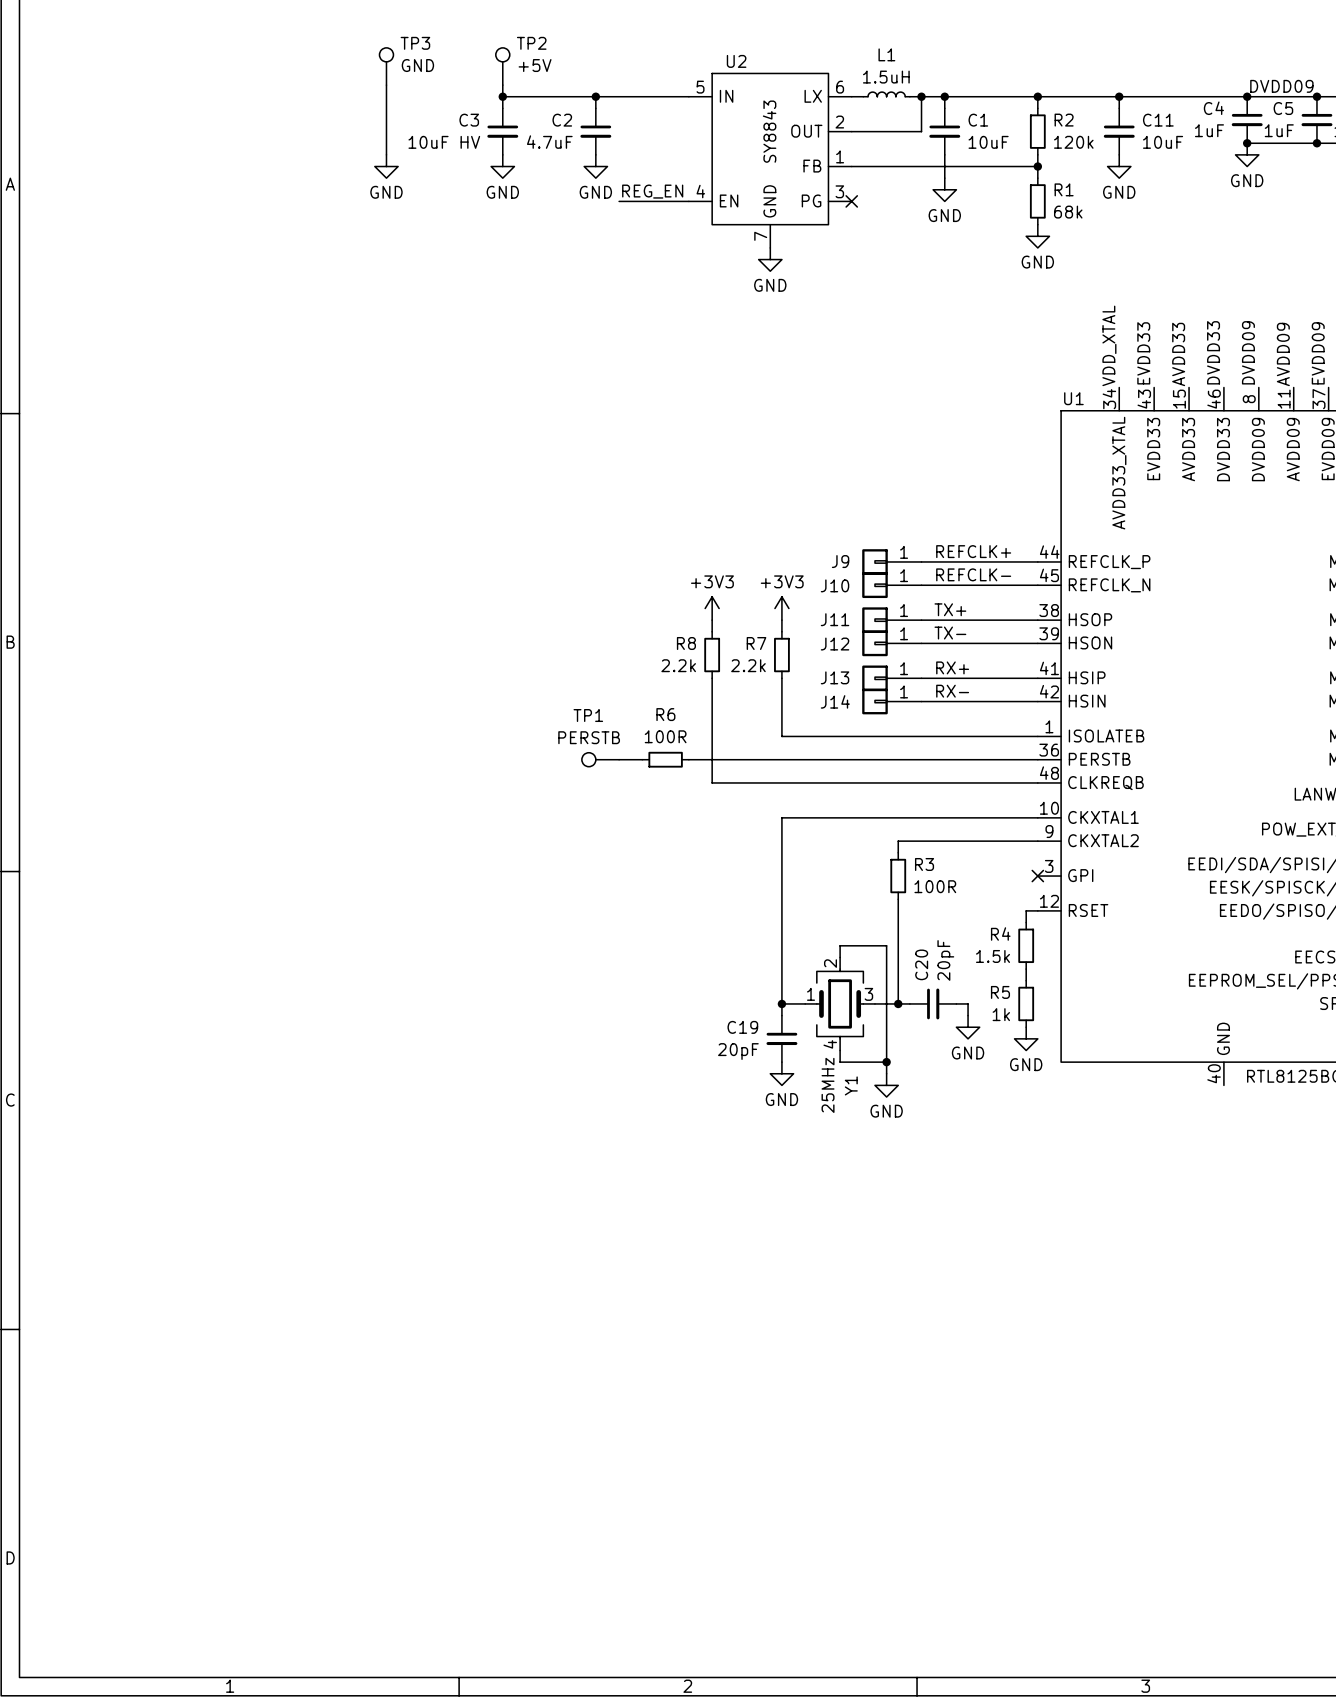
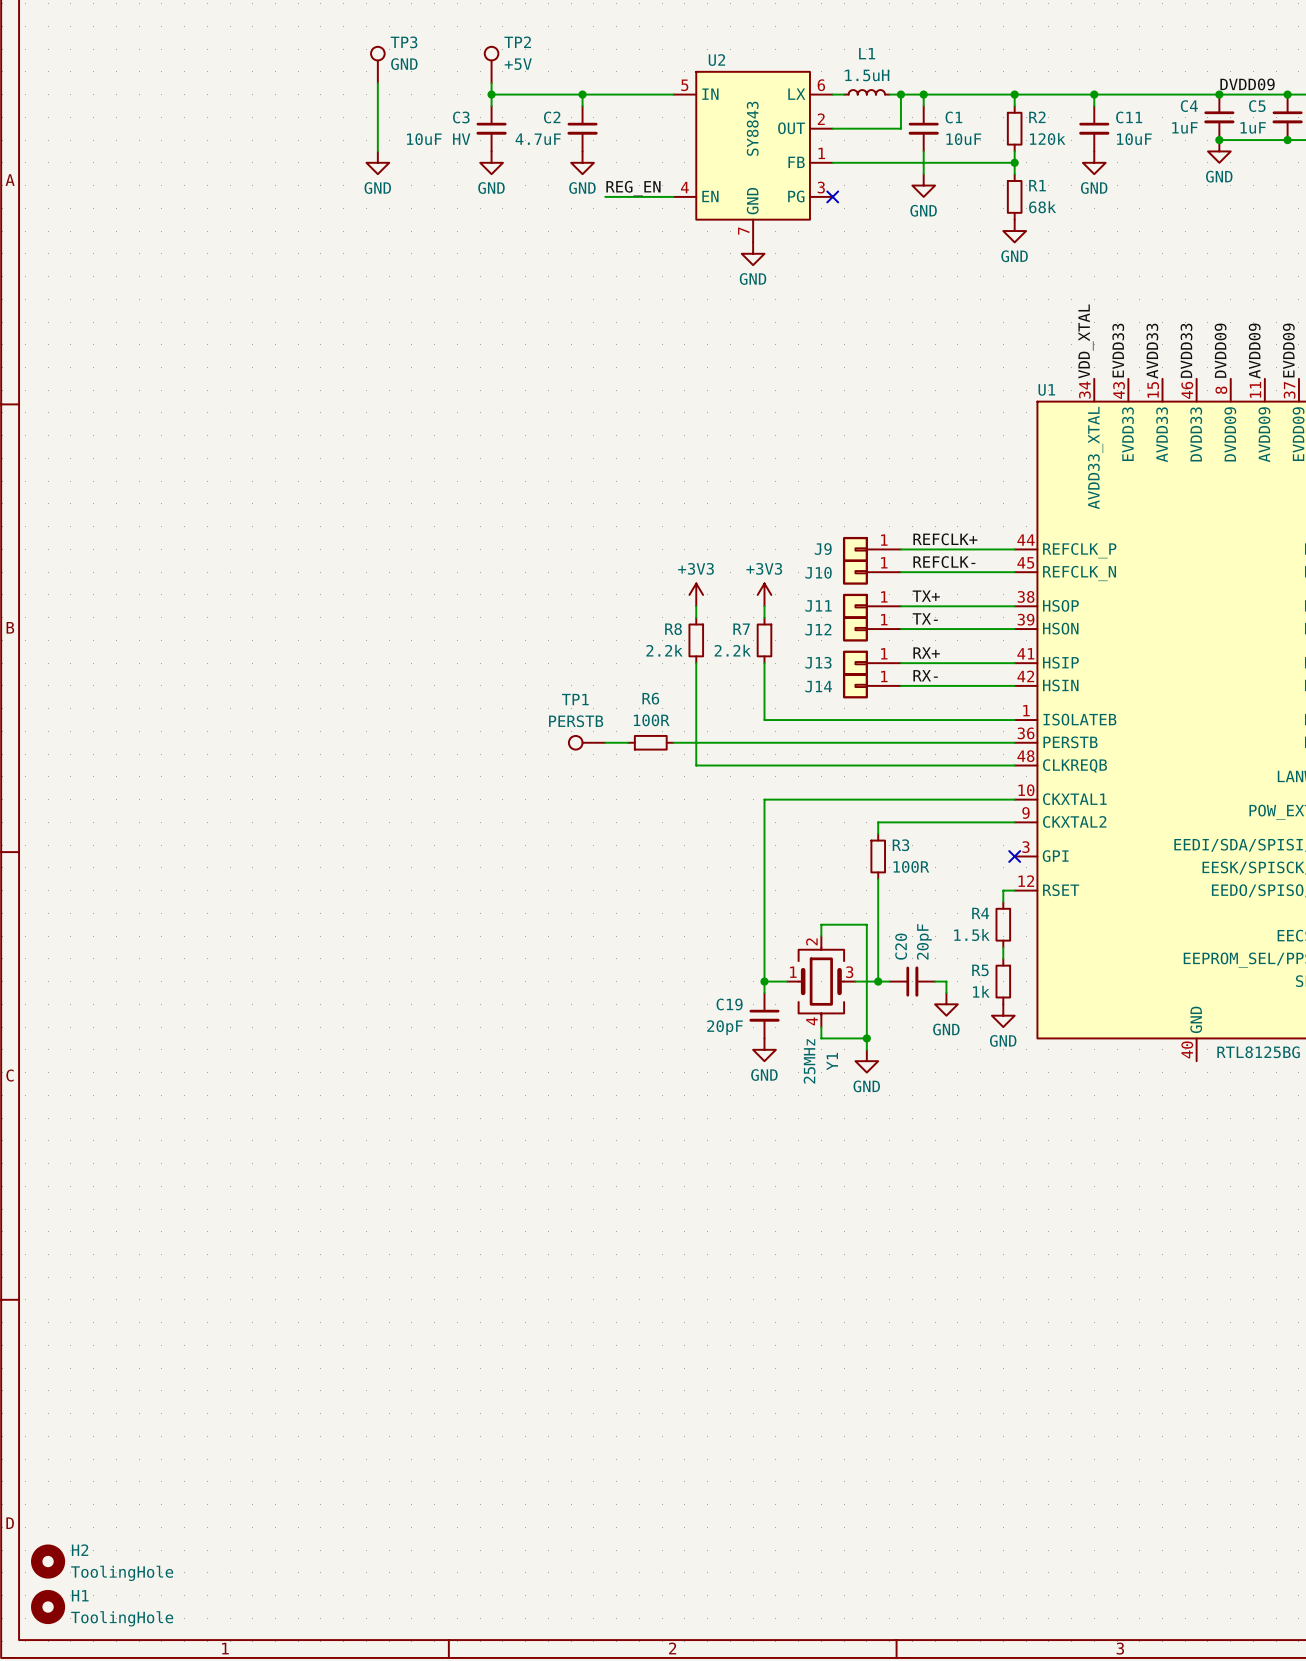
H2: none -> ToolingHole (48, 1561)
H1: none -> ToolingHole (48, 1607)

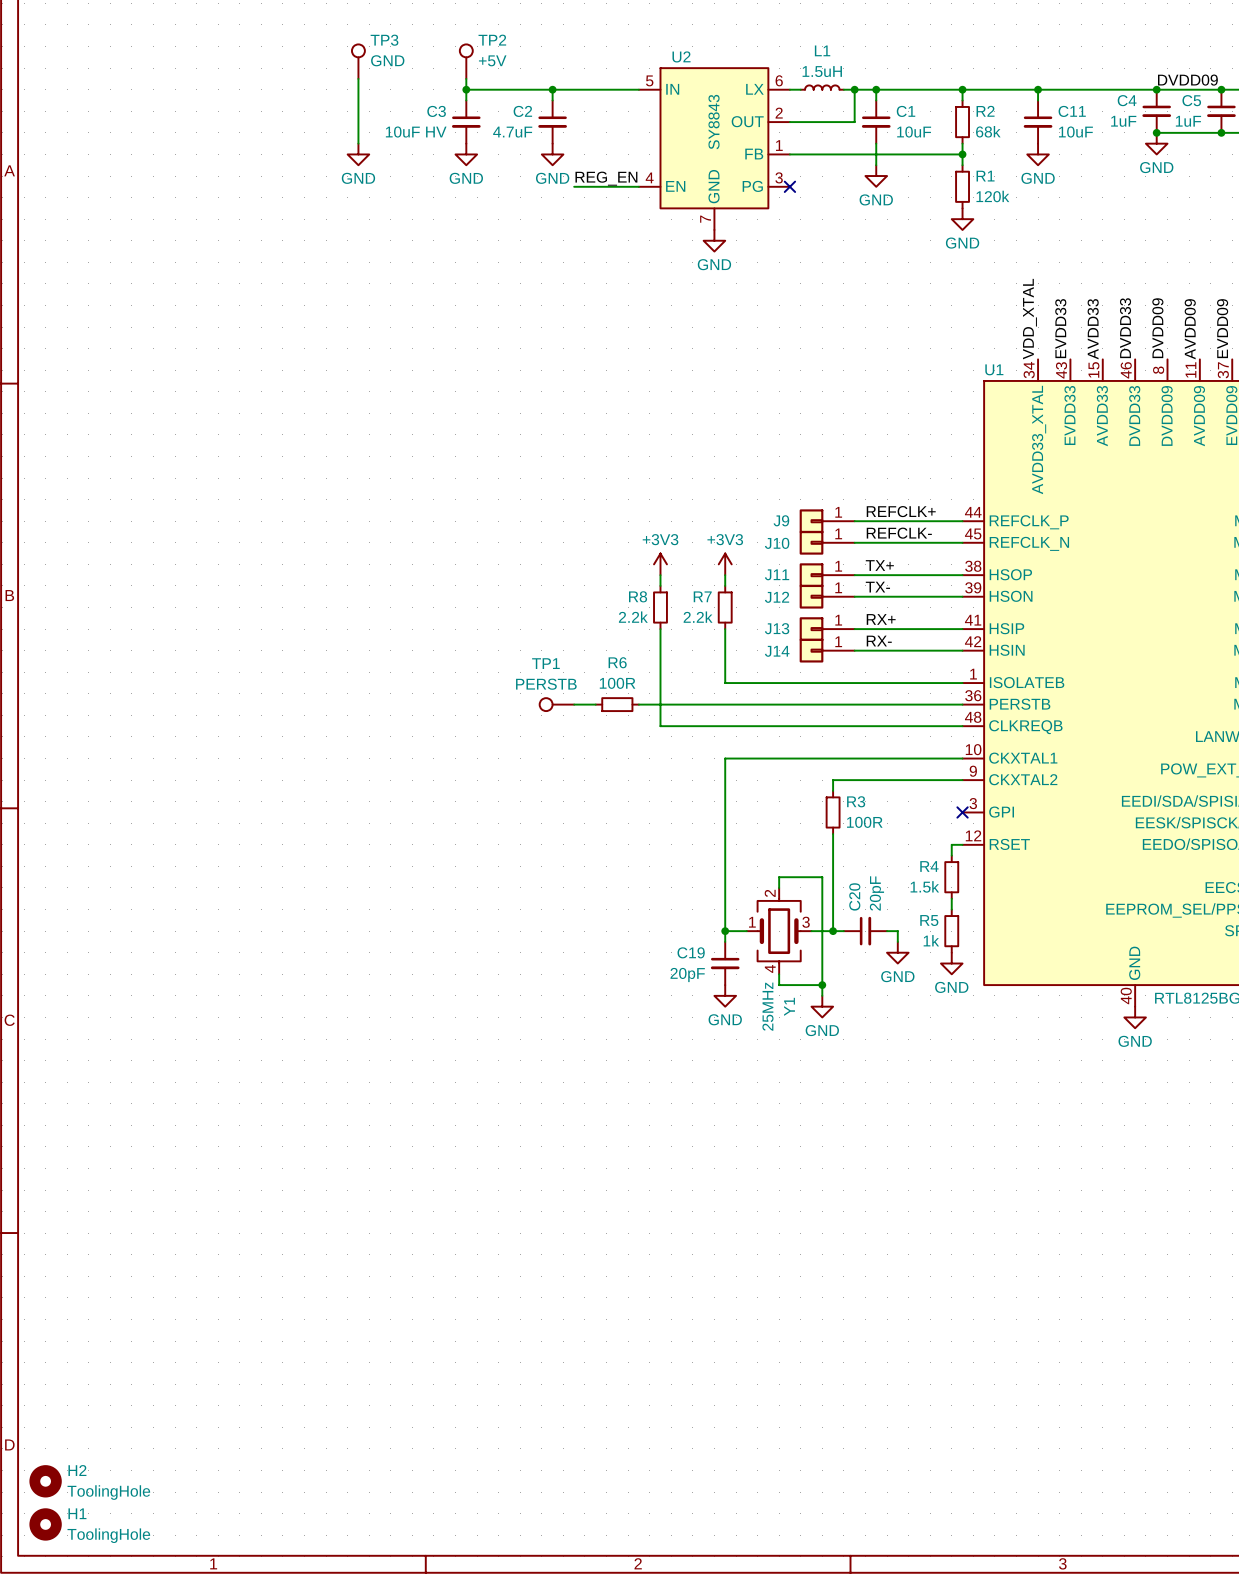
R2 value: 120k (1047, 138) -> 68k (988, 131)
R1 value: 68k (1042, 207) -> 120k (992, 196)
power symbol: none -> GND (1135, 1017)

